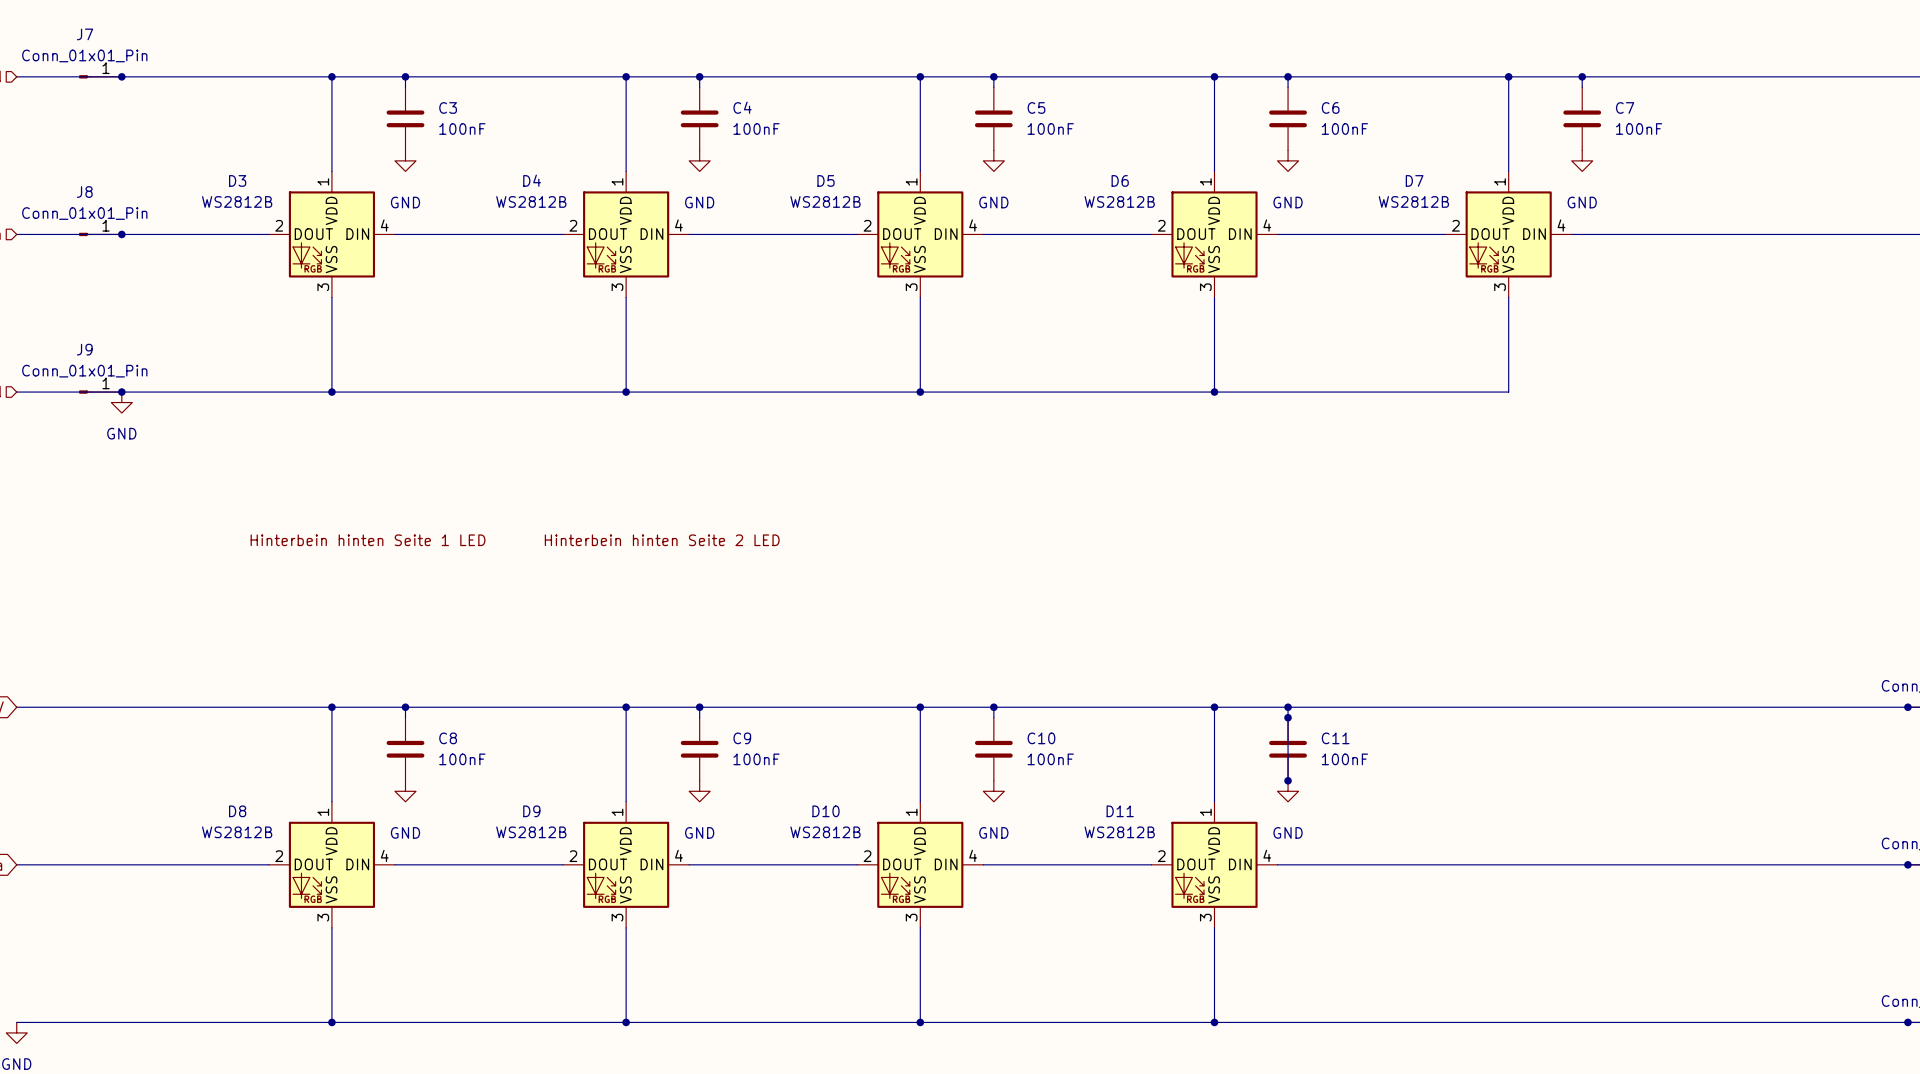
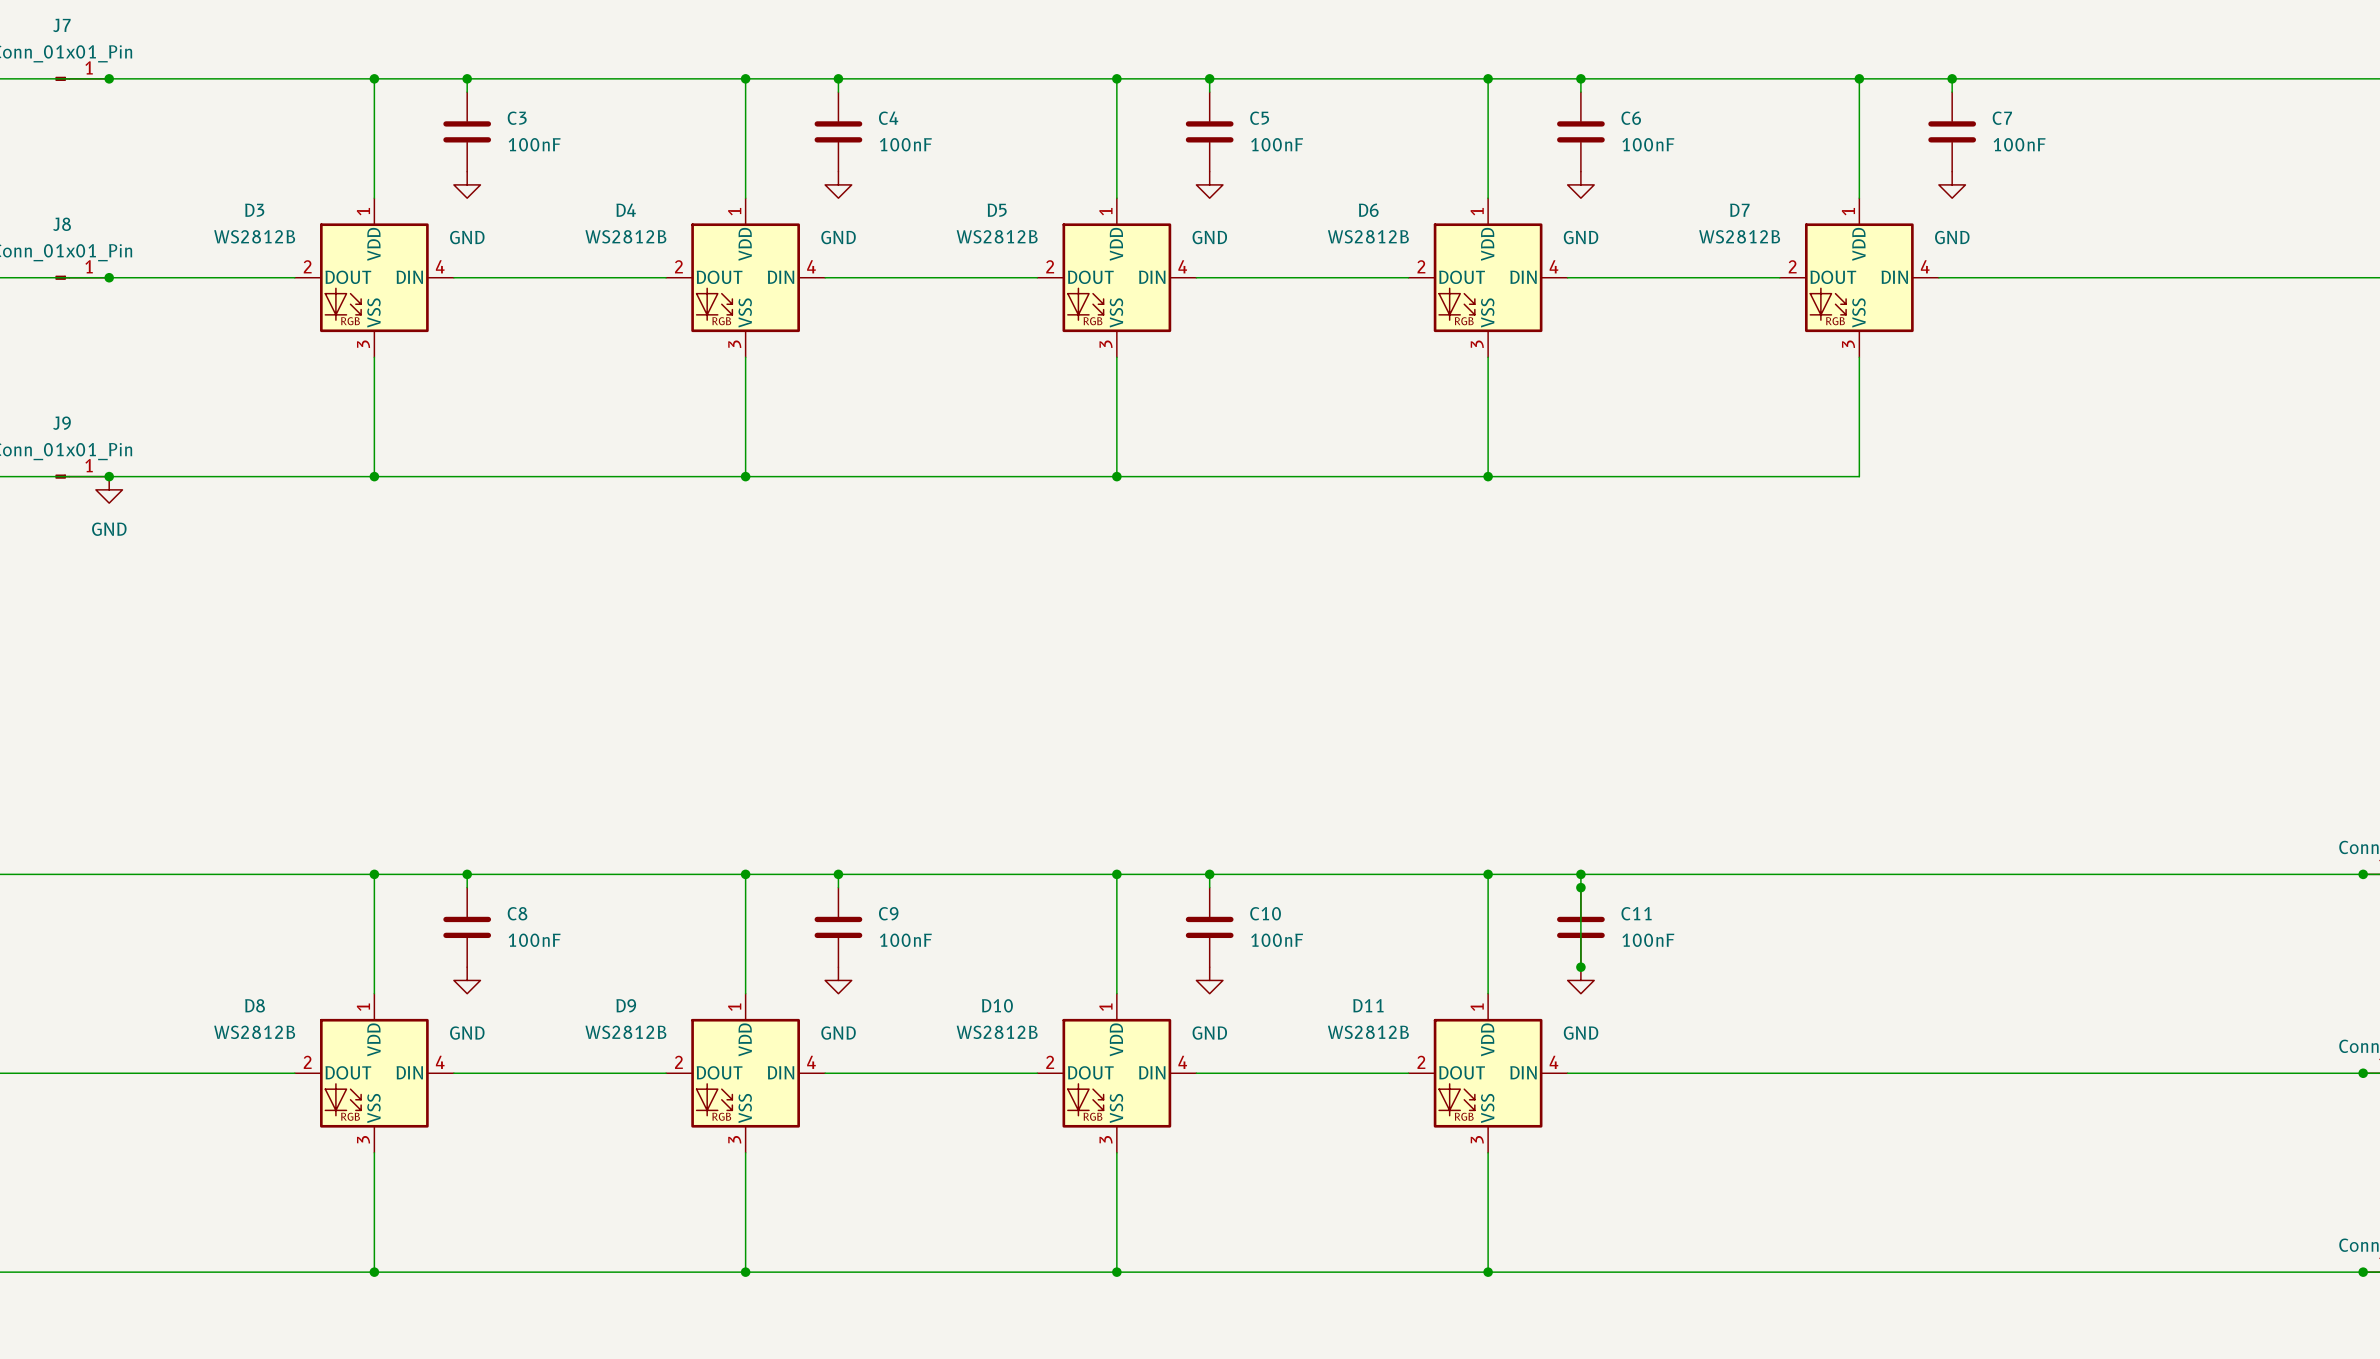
label: Hinterbein hinten Seite 1 LED (368, 540) -> none
label: Hinterbein hinten Seite 2 LED (662, 540) -> none

